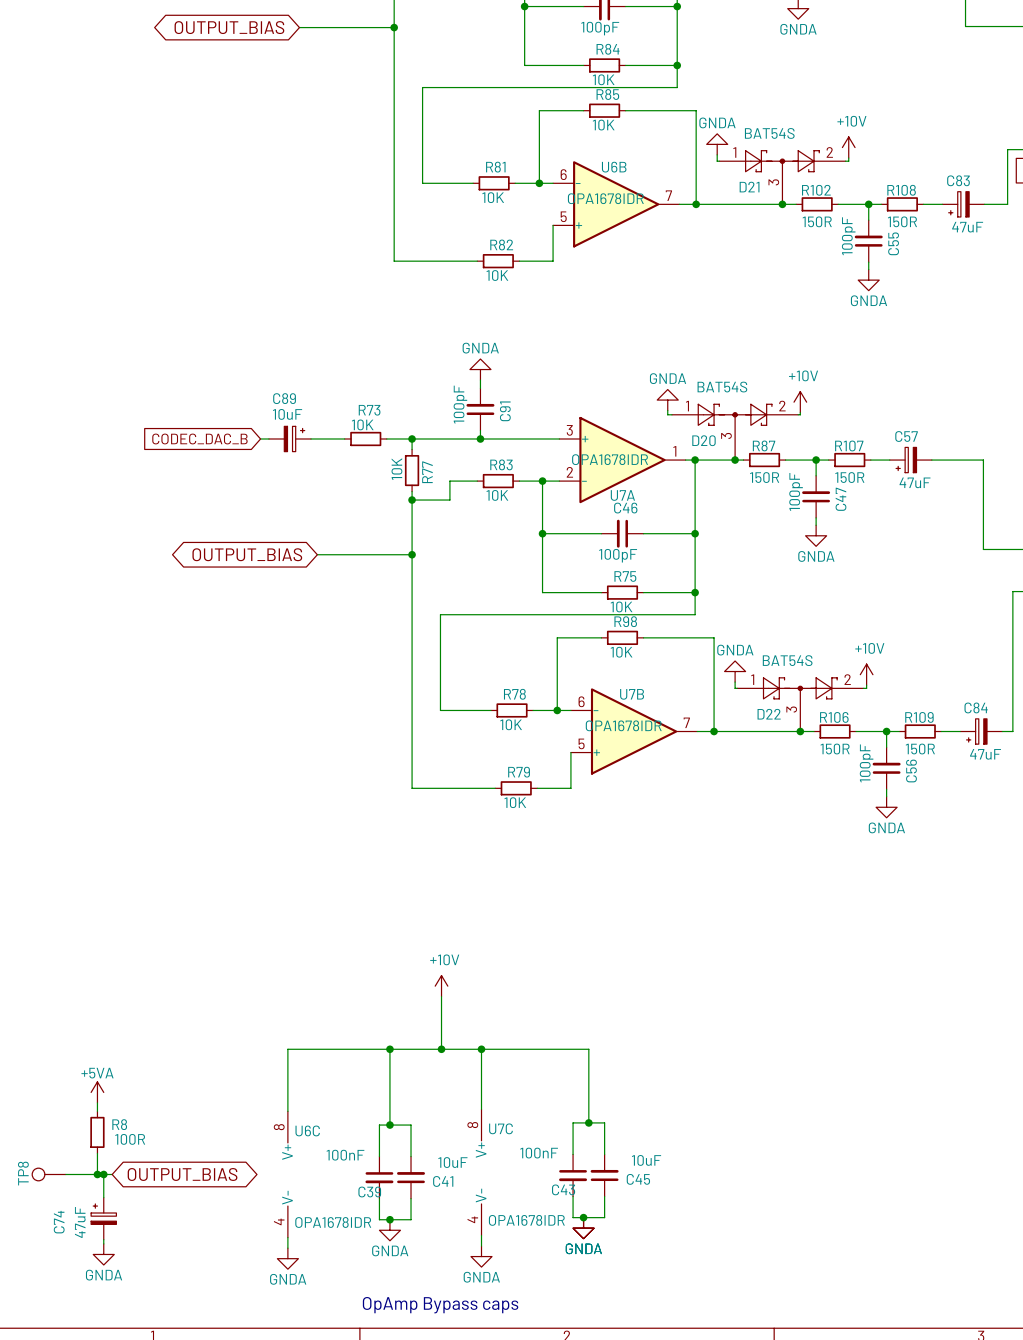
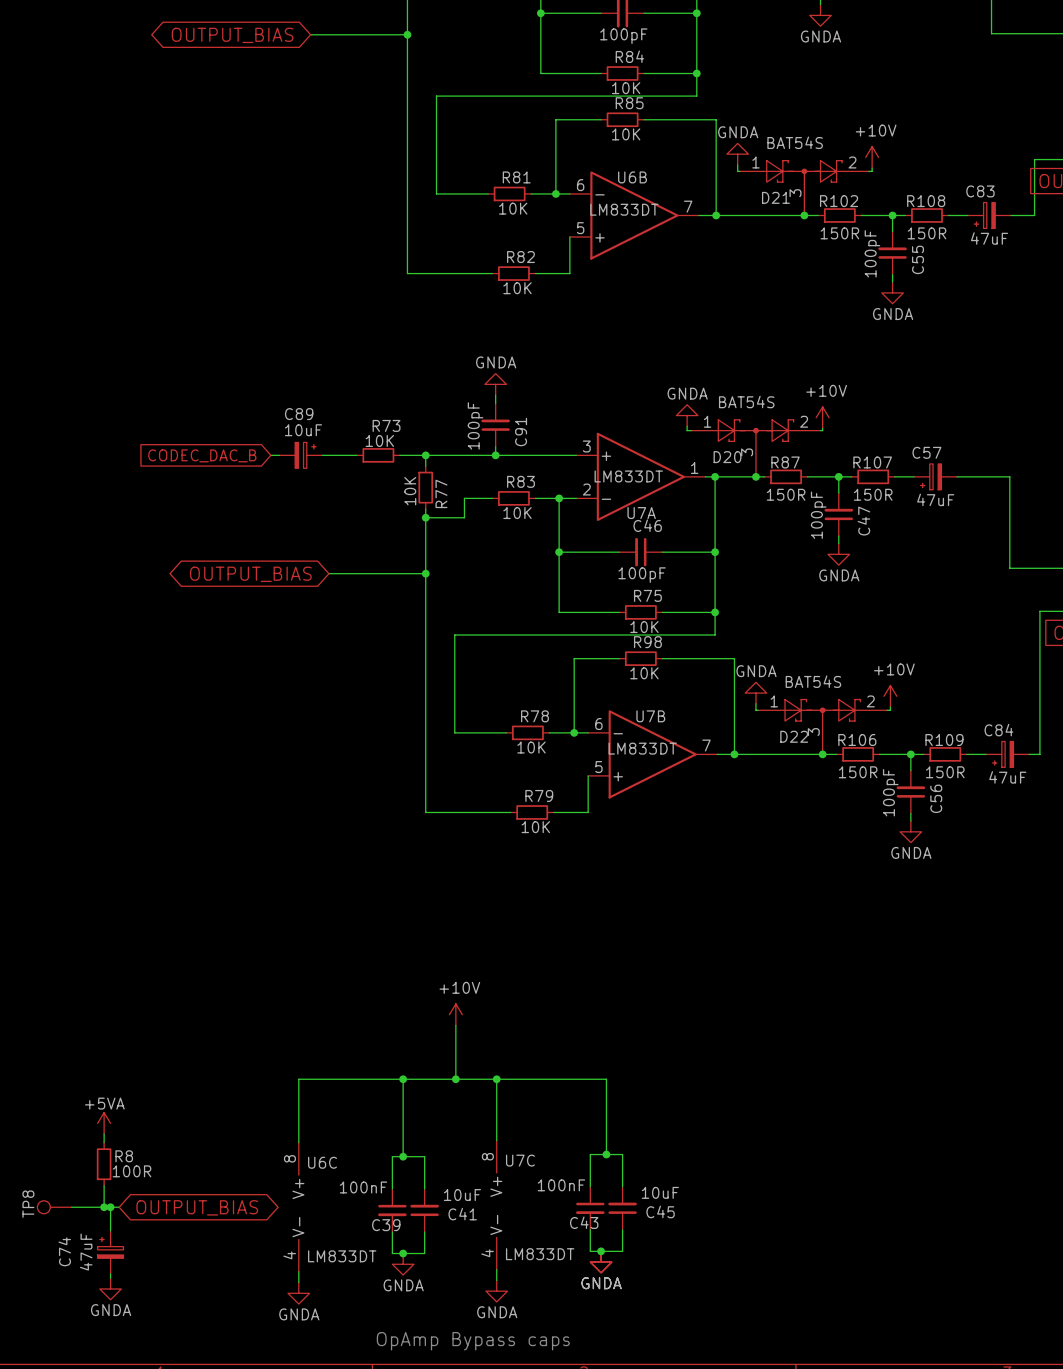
U6B value: OPA1678IDR (605, 198) -> LM833DT (624, 209)
U7A value: OPA1678IDR (610, 459) -> LM833DT (628, 476)
U7B value: OPA1678IDR (623, 725) -> LM833DT (642, 748)
U7C value: OPA1678IDR (526, 1220) -> LM833DT (540, 1254)
U6C value: OPA1678IDR (333, 1222) -> LM833DT (342, 1256)

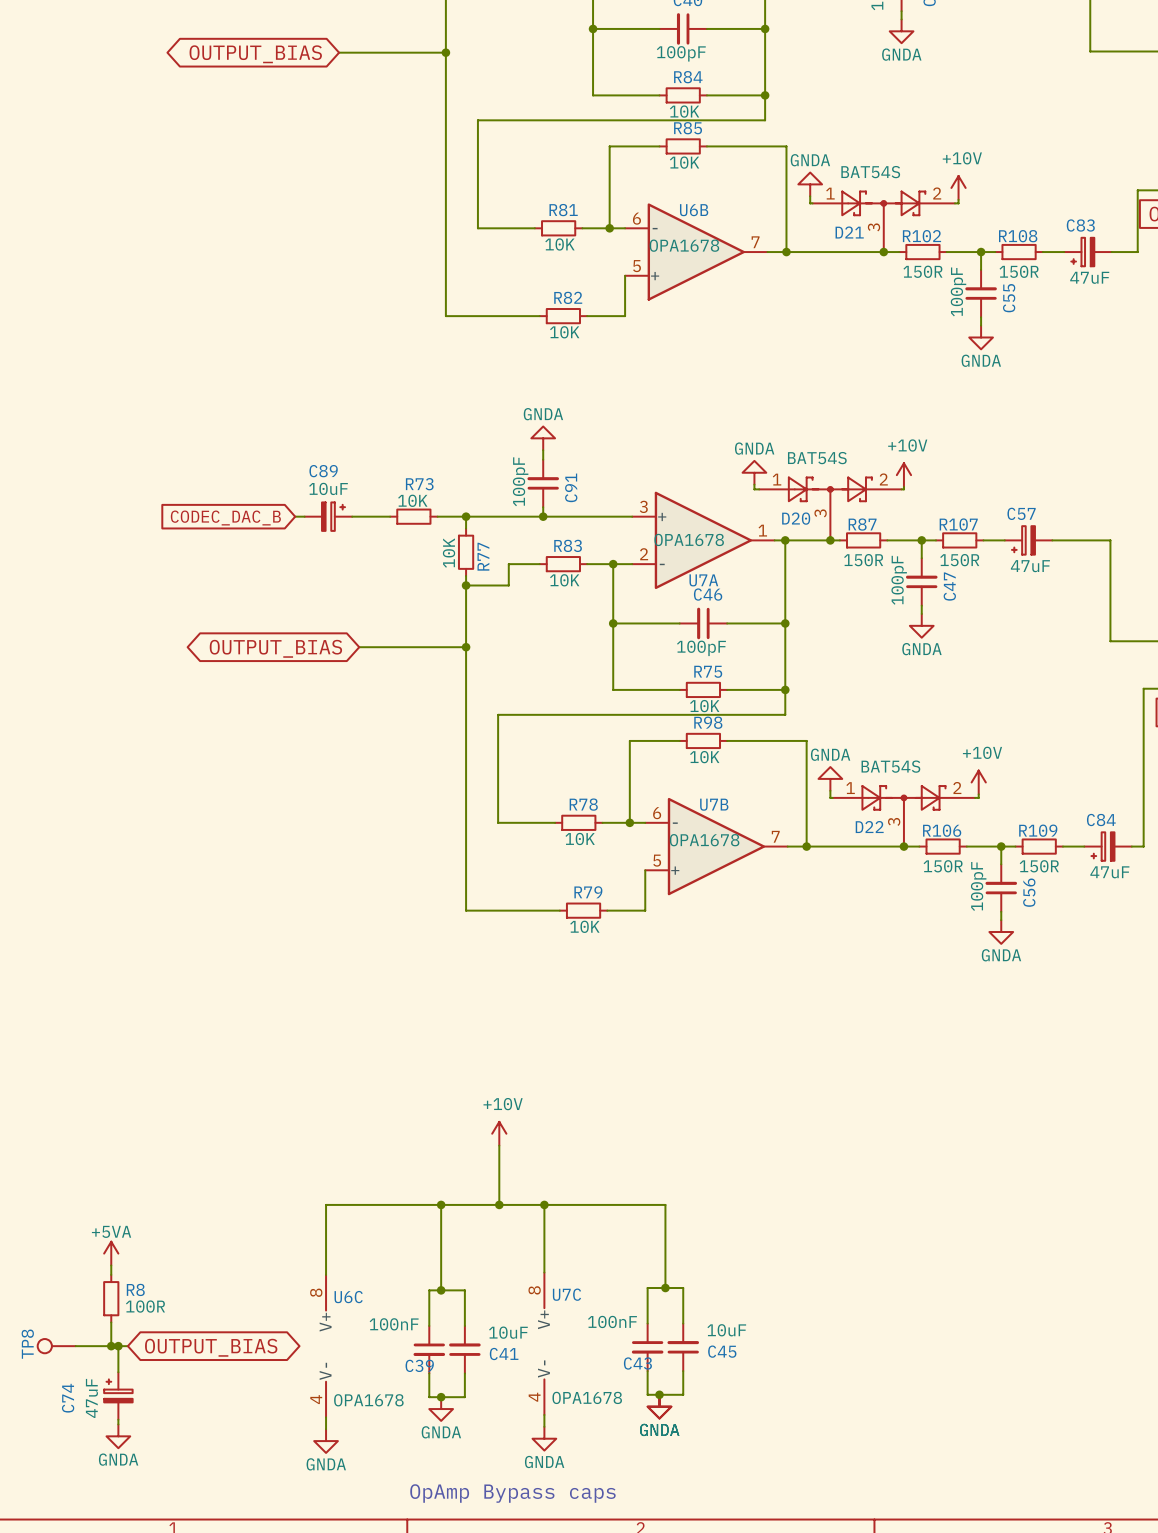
U6B value: LM833DT (624, 209) -> OPA1678 (684, 245)
U7A value: LM833DT (628, 476) -> OPA1678 (689, 539)
U7B value: LM833DT (642, 748) -> OPA1678 (704, 840)
U7C value: LM833DT (540, 1254) -> OPA1678 (587, 1397)
U6C value: LM833DT (342, 1256) -> OPA1678 (368, 1400)

